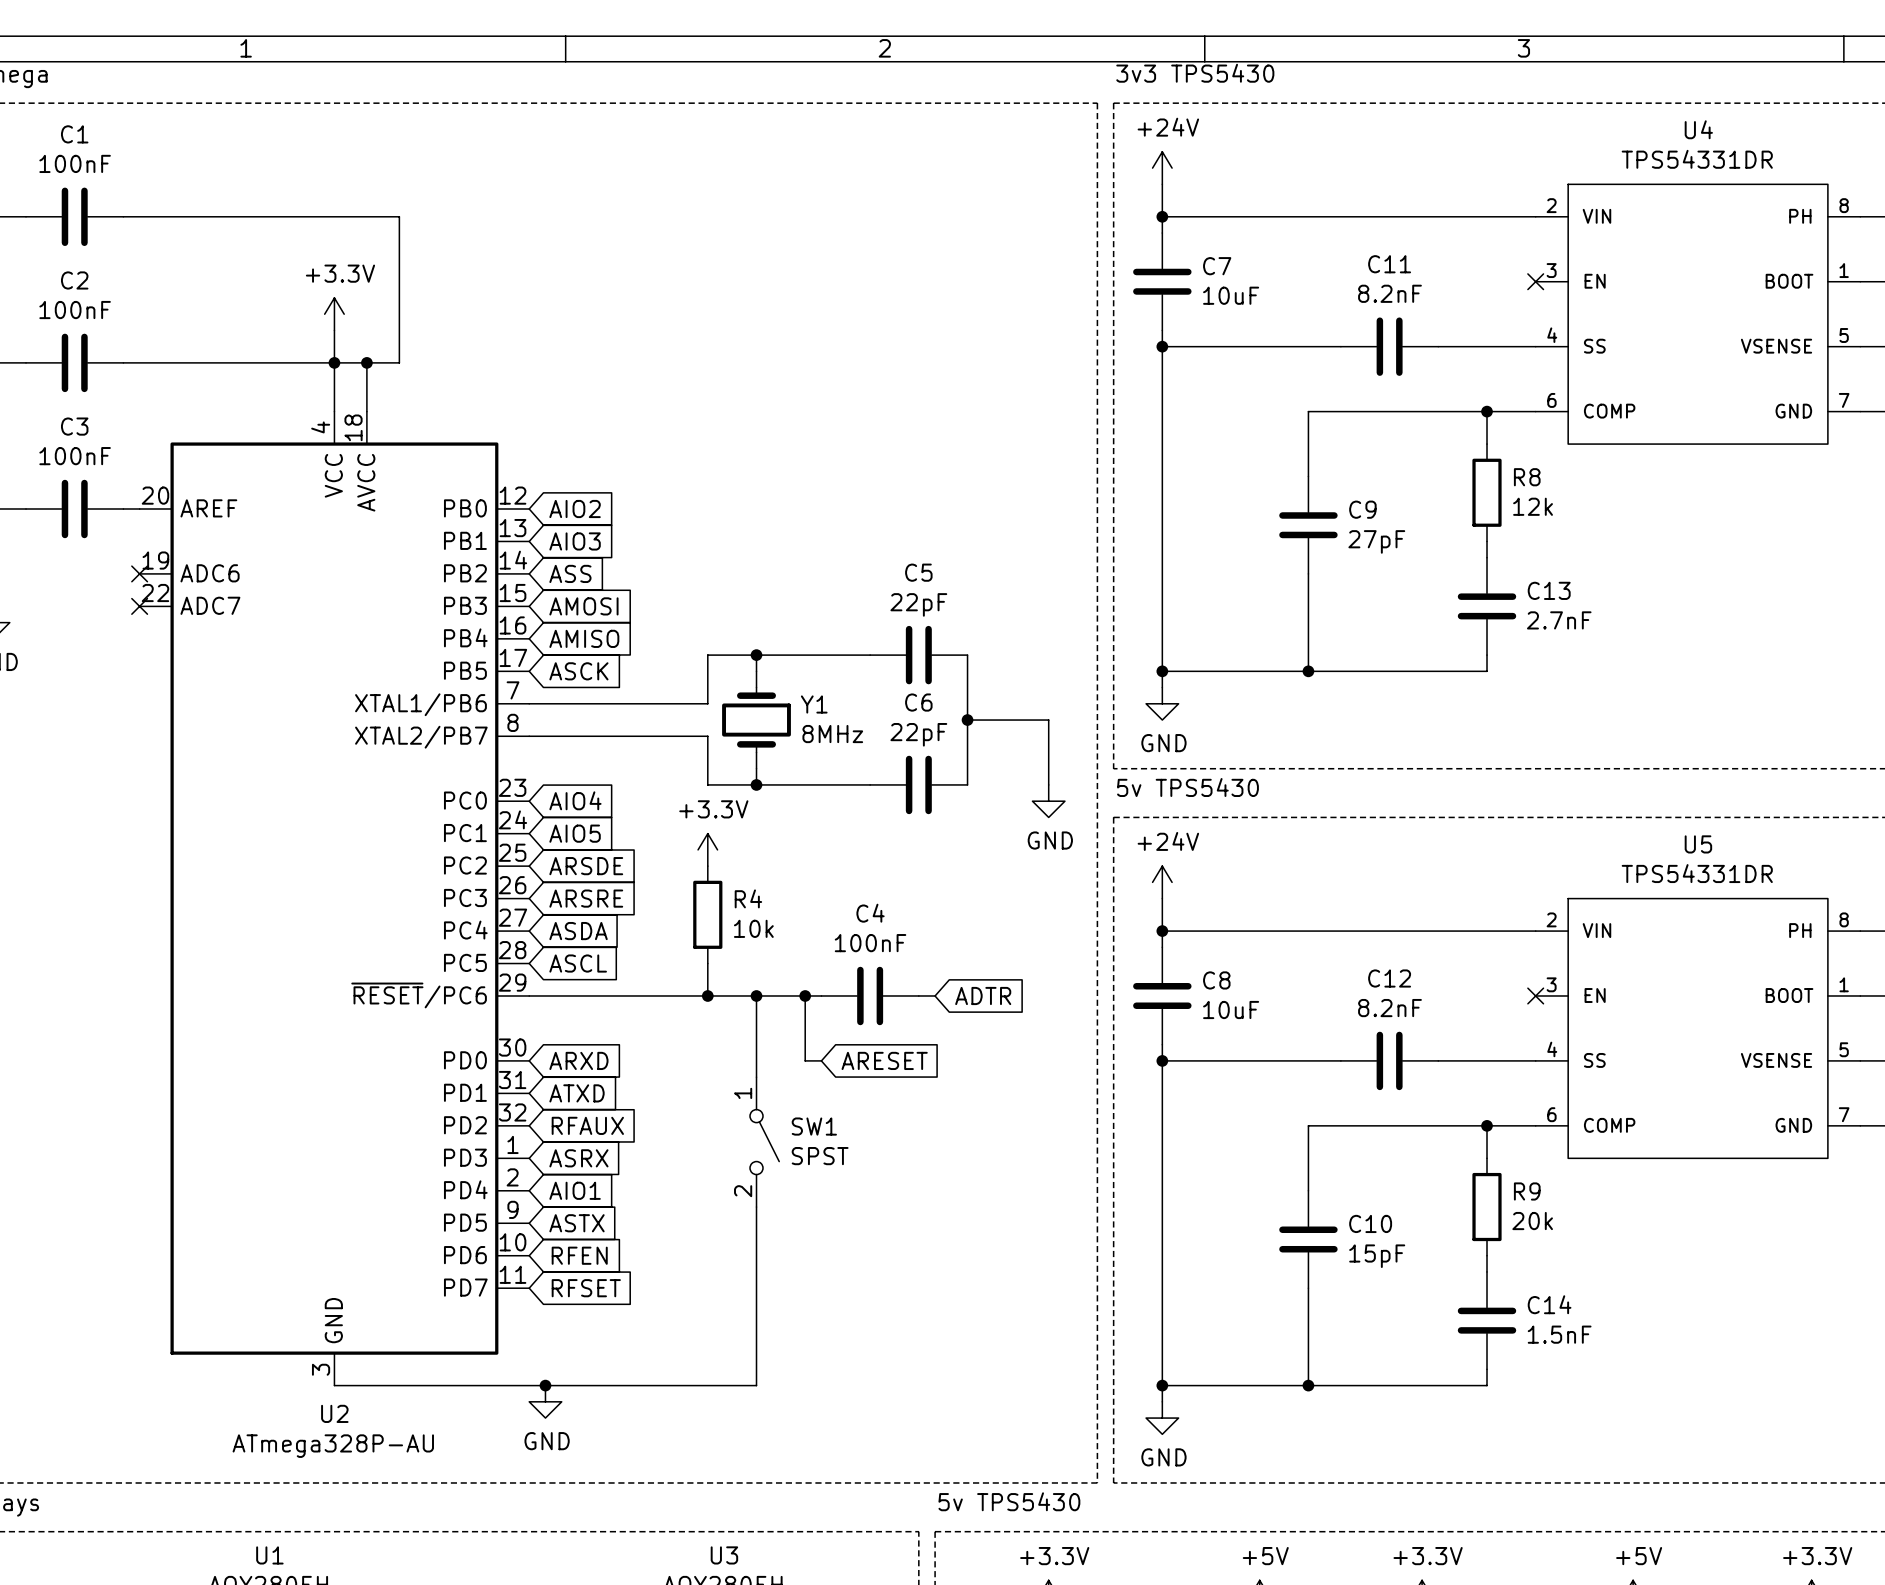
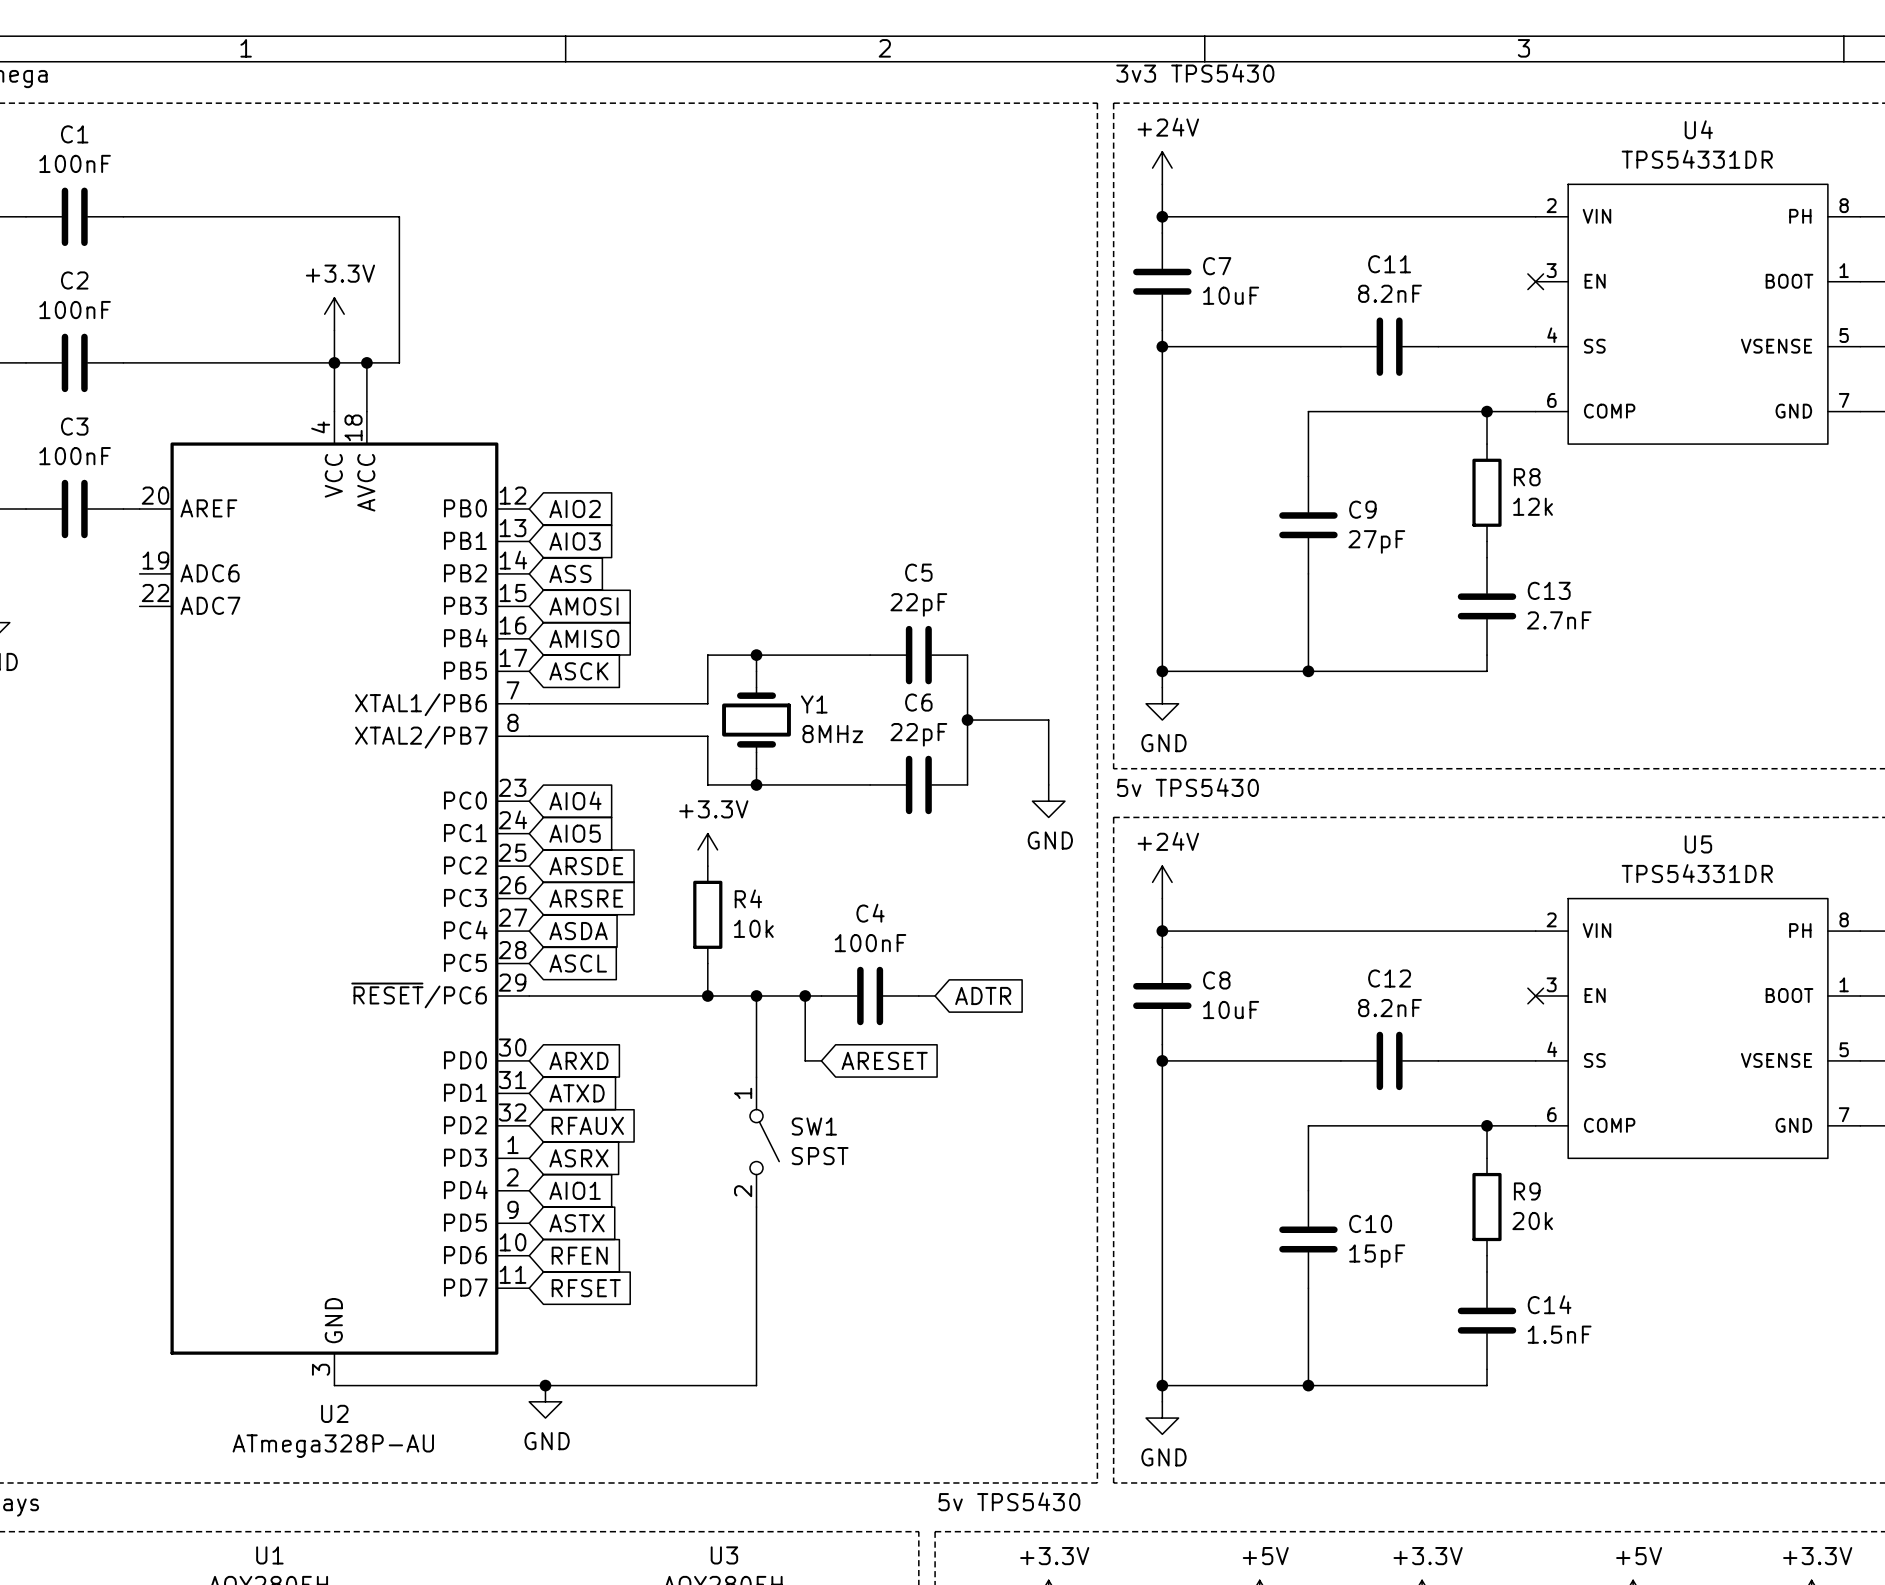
no-connect mark: (139, 573) -> none
no-connect mark: (139, 606) -> none

